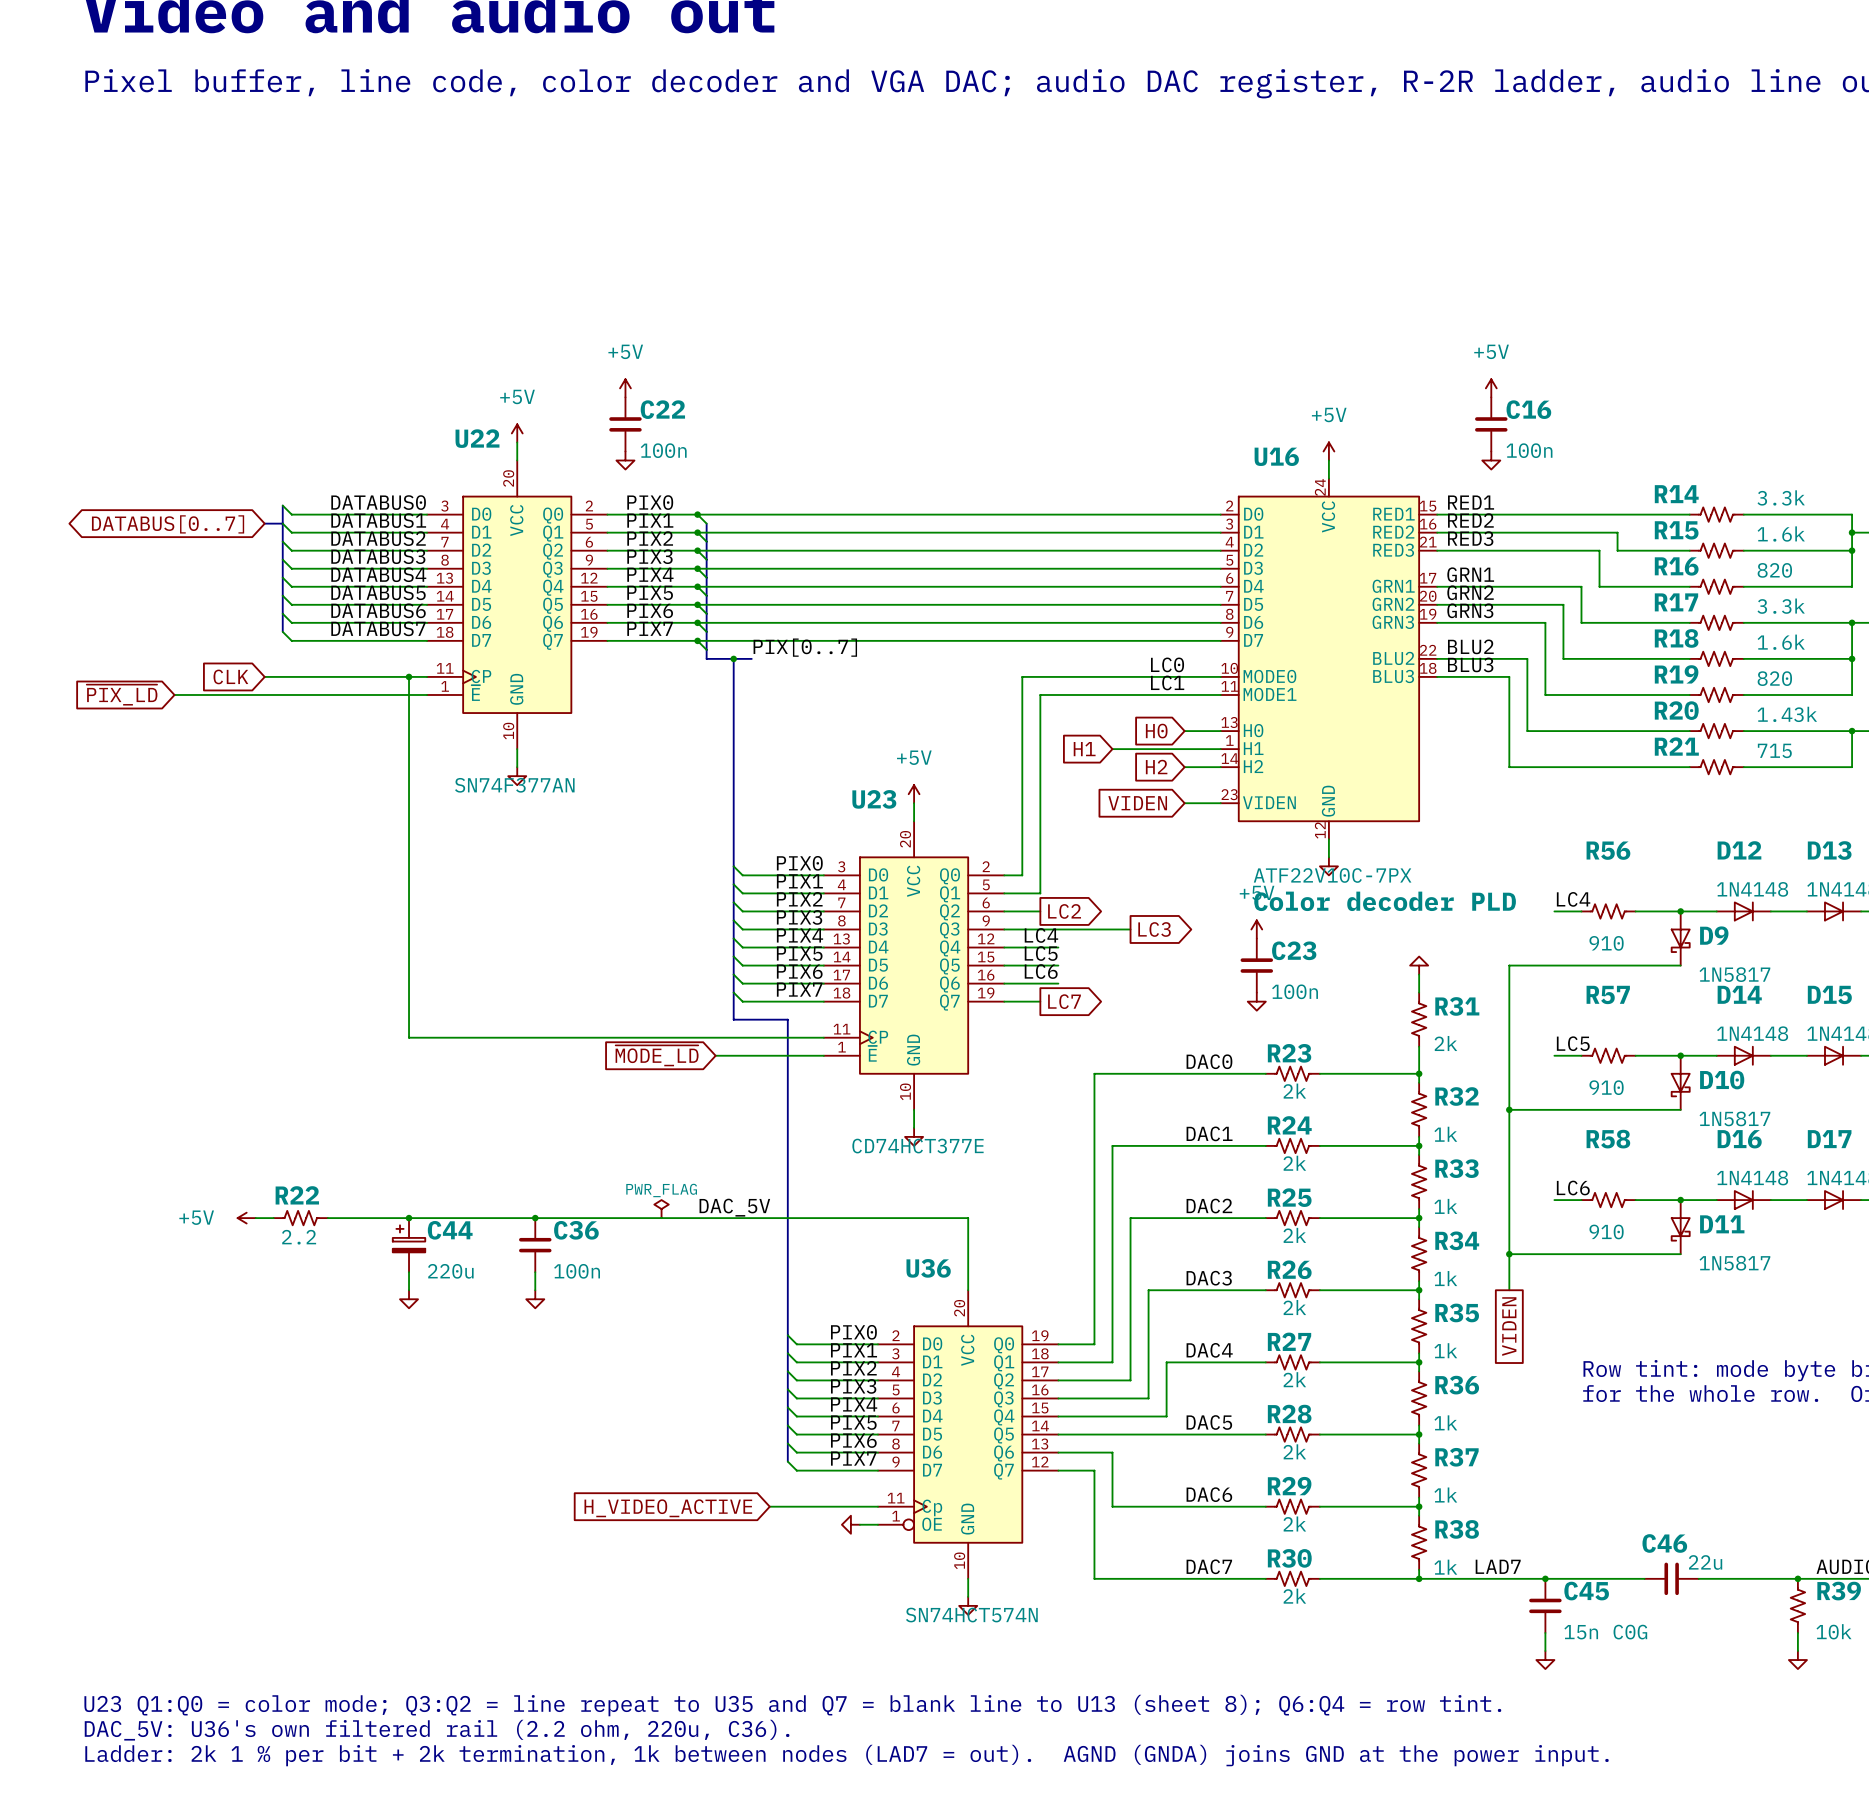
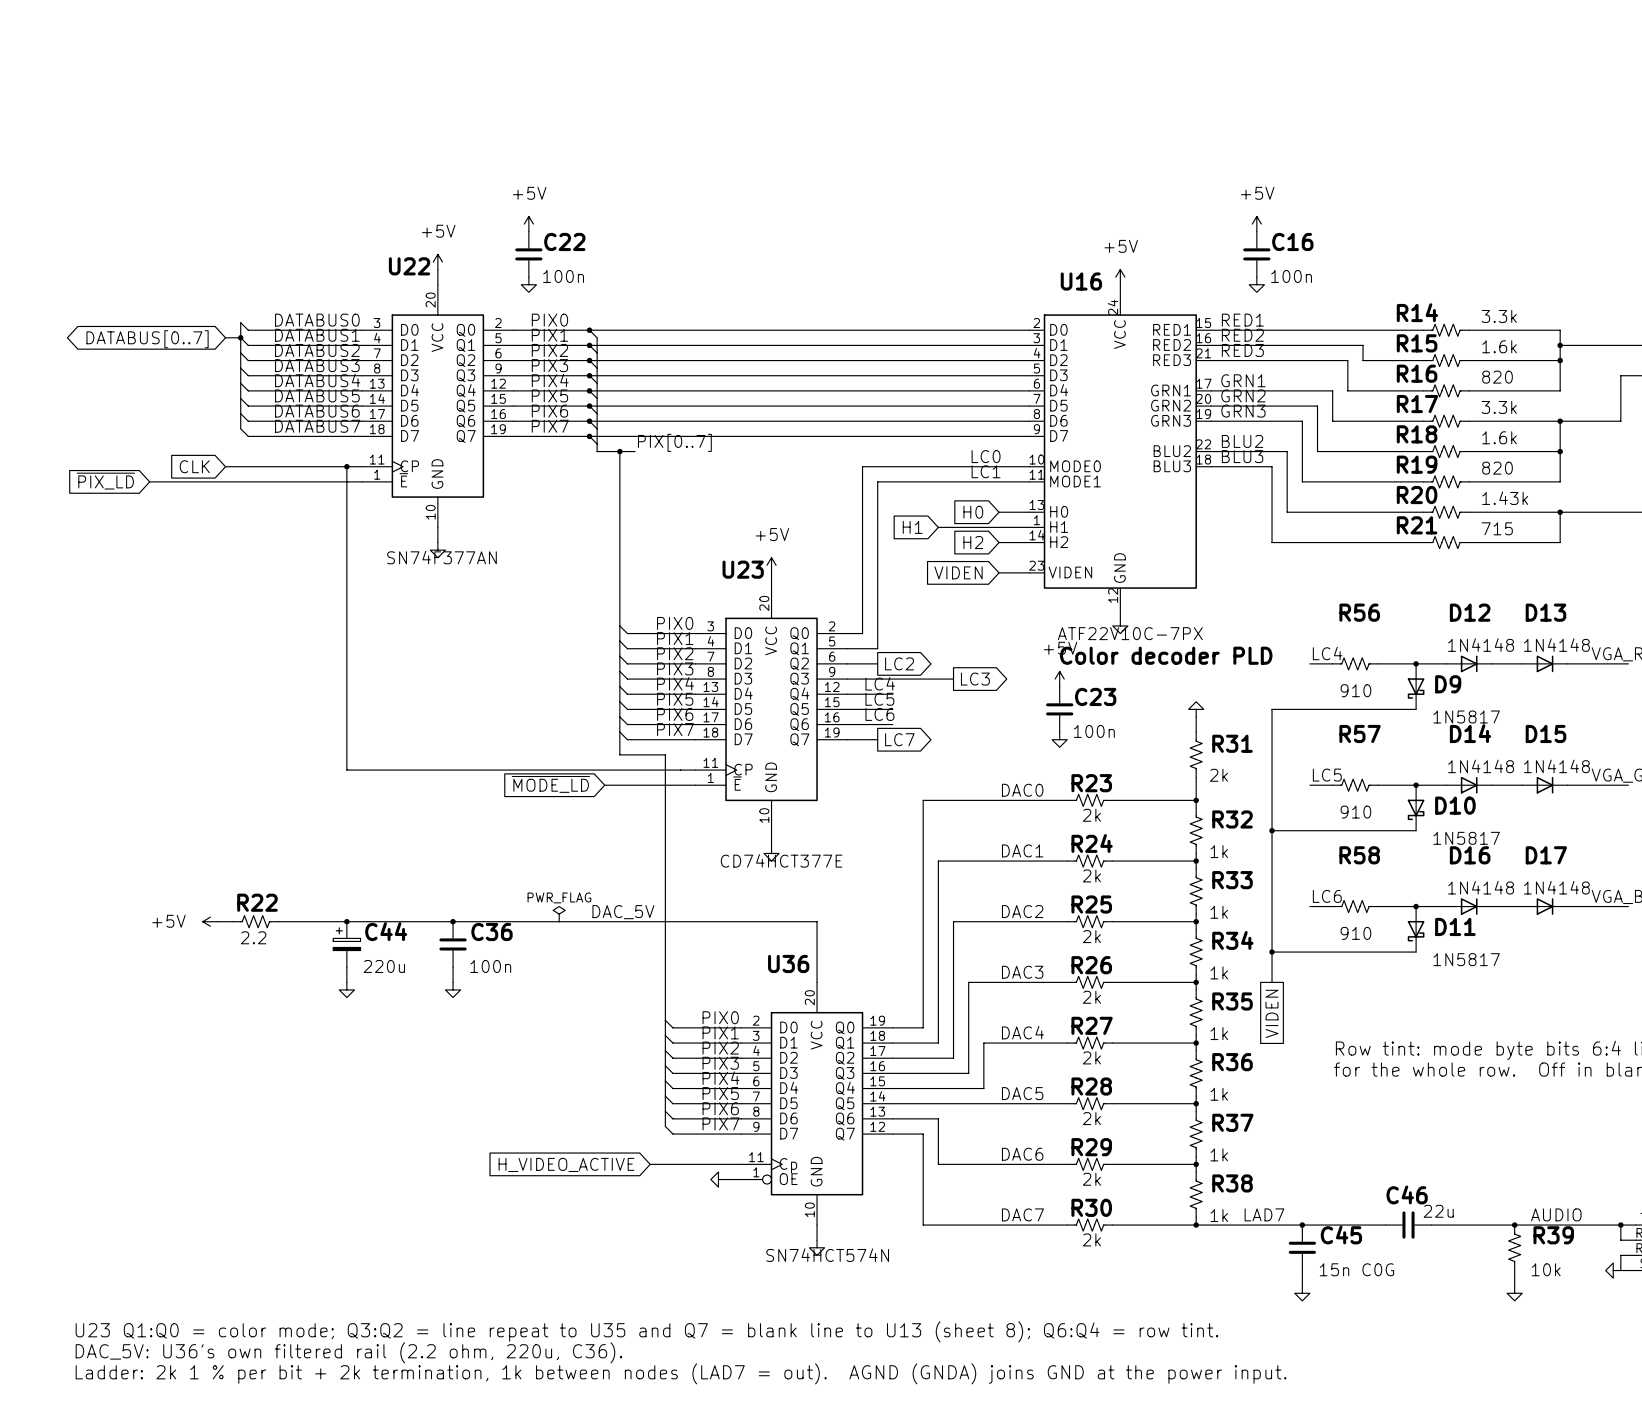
junction: none -> (240, 337)

